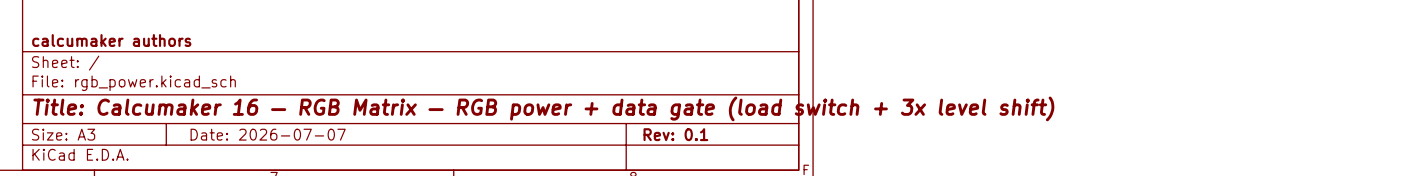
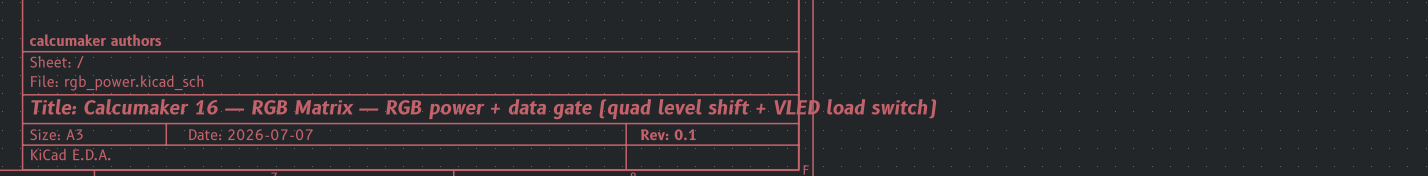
title block: Title: Calcumaker 16 — RGB Matrix — RGB power + data gate (load switch + 3x level shift) (543, 108) -> Title: Calcumaker 16 — RGB Matrix — RGB power + data gate (quad level shift + VLED load switch) (483, 109)

